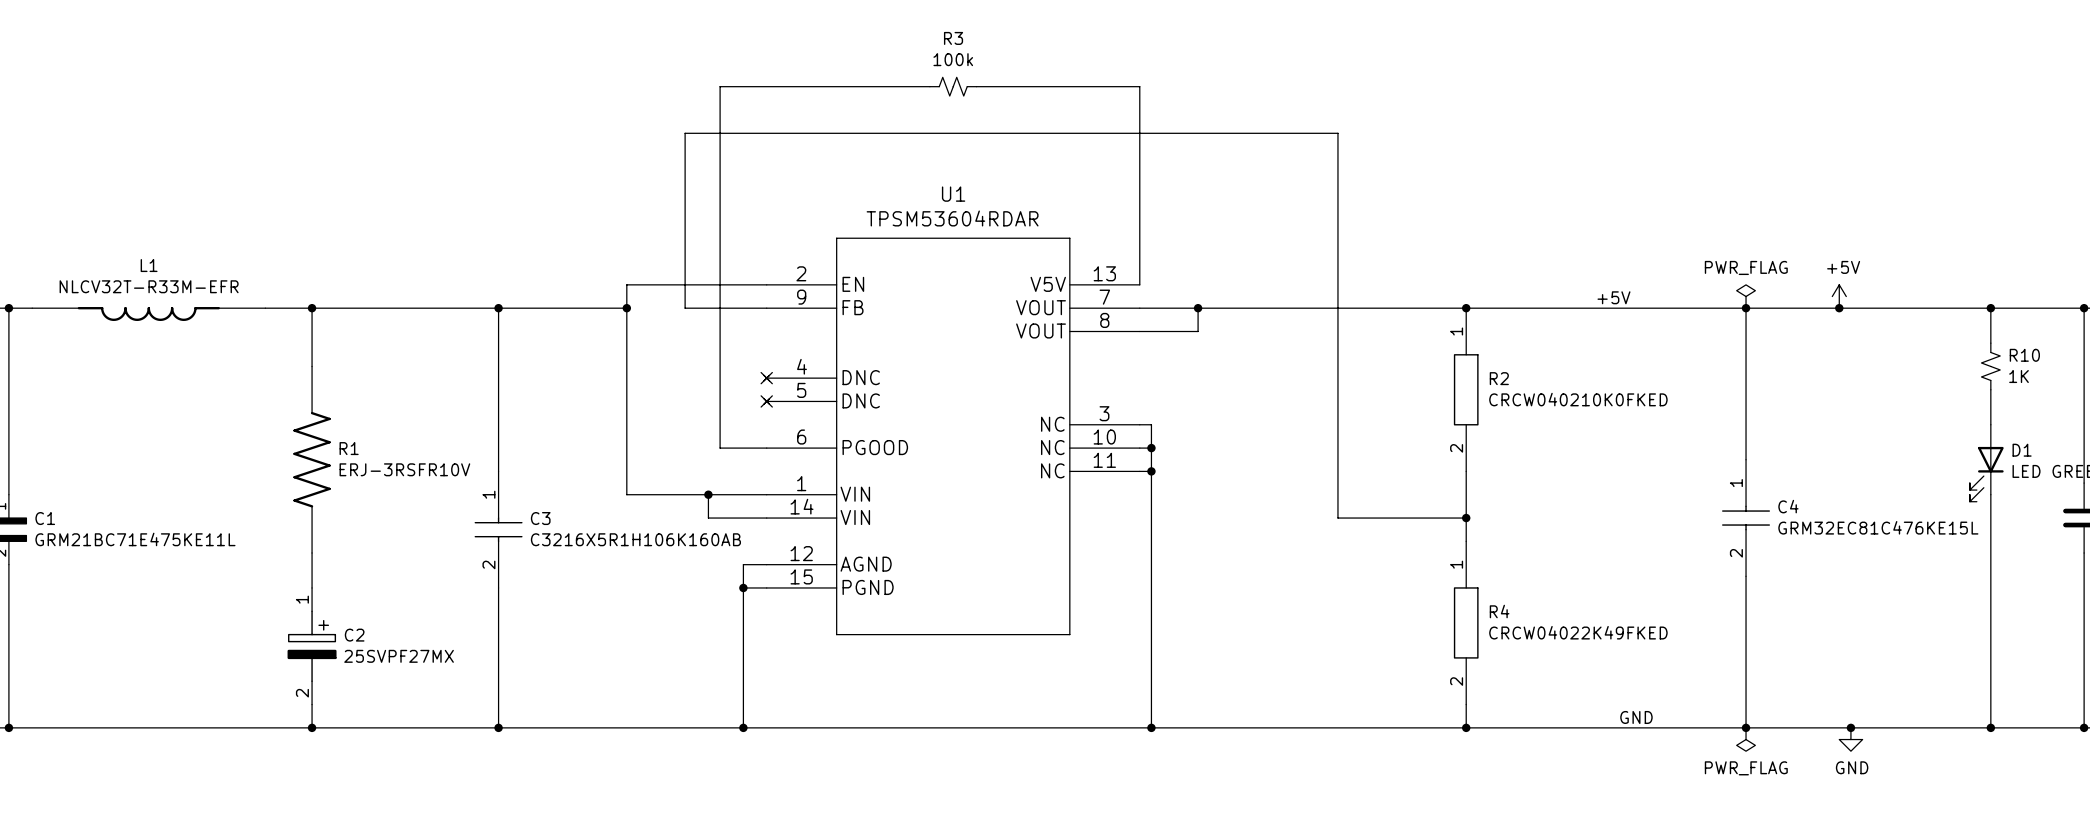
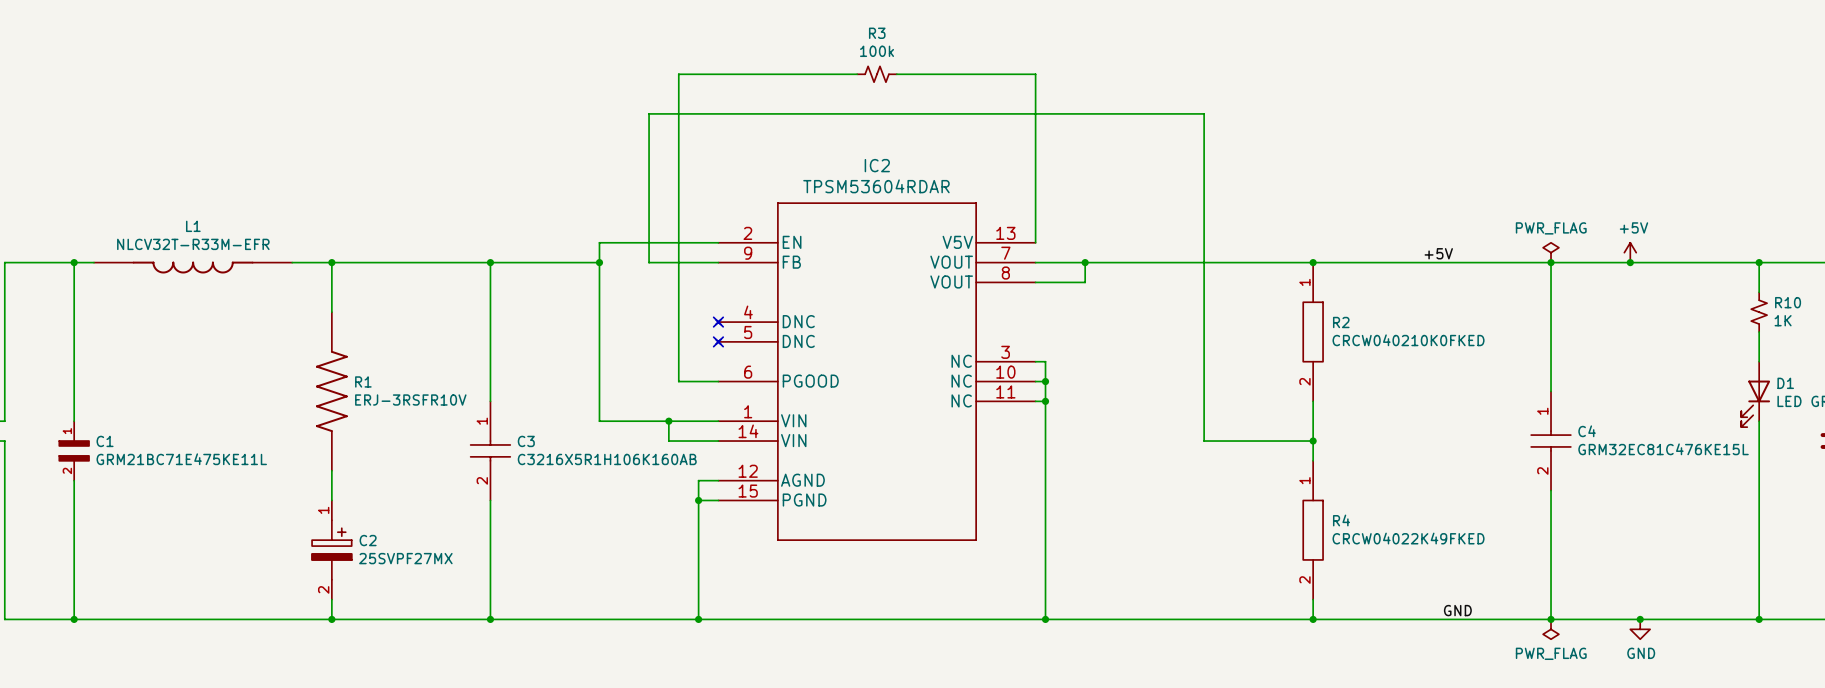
U1 name: U1 (953, 194) -> IC2 (877, 165)

